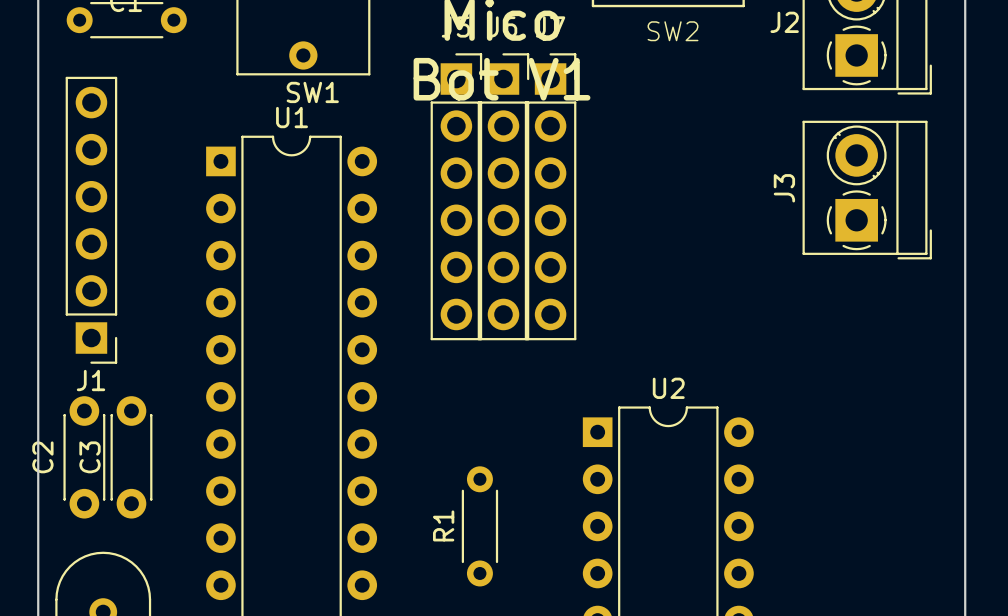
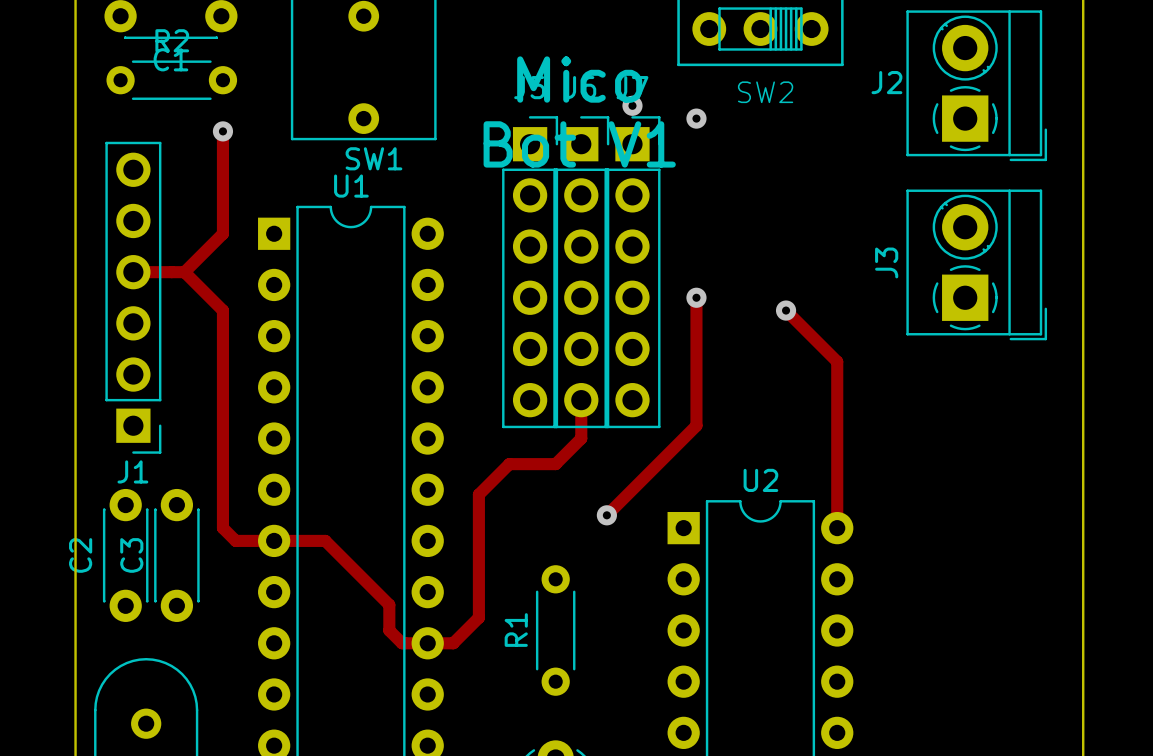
via: none -> (632, 105)
via: none -> (696, 118)
track: none -> (222, 131) (222, 233) (184, 272)
via: none -> (222, 131)
track: none -> (133, 272) (184, 272)
track: none -> (184, 272) (222, 310) (222, 528) (235, 540) (325, 540) (389, 604) (389, 630) (402, 643) (453, 643) (478, 617) (478, 494) (509, 464) (555, 464) (581, 438) (581, 400)
track: none -> (696, 297) (696, 425) (606, 515)
via: none -> (696, 297)
track: none -> (786, 310) (837, 361) (837, 528)
via: none -> (786, 310)
via: none -> (606, 515)

